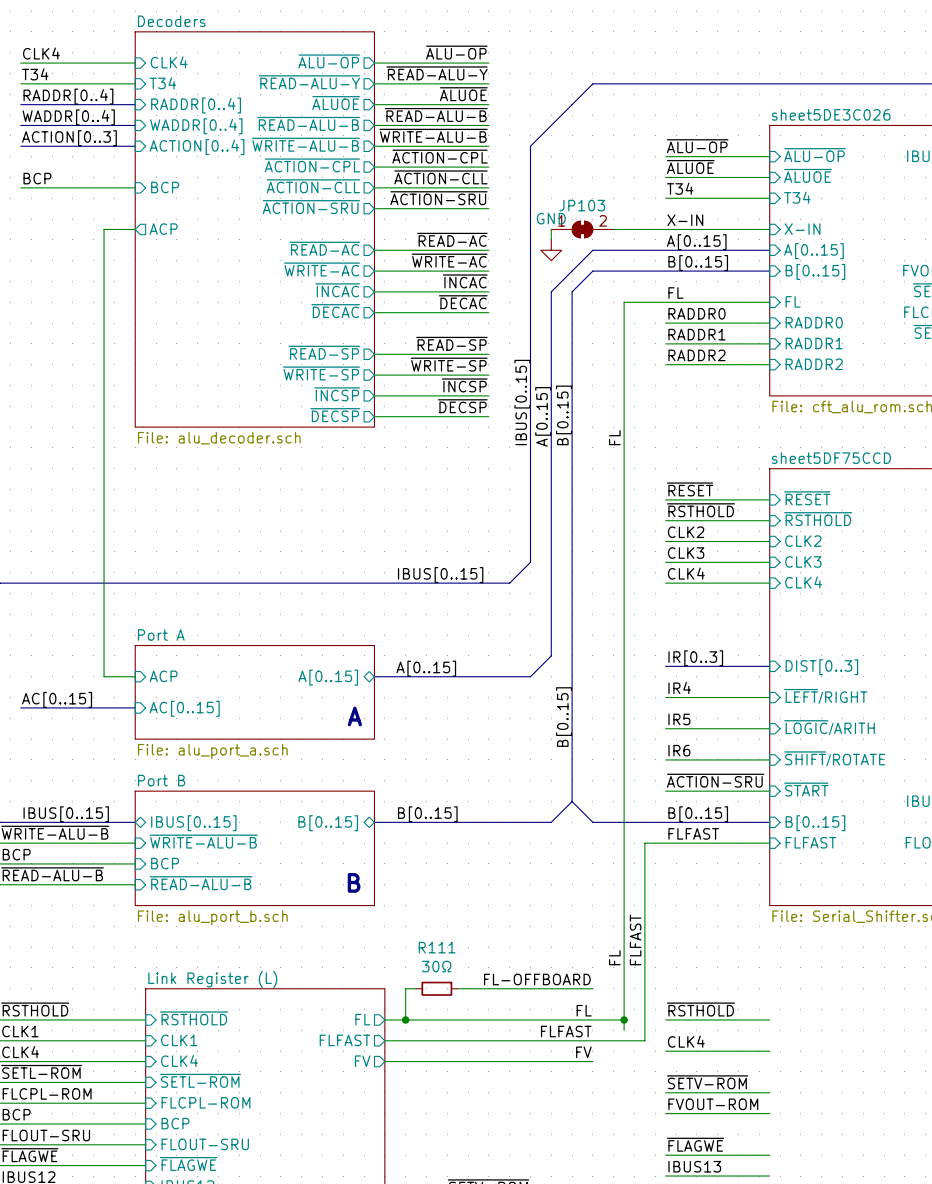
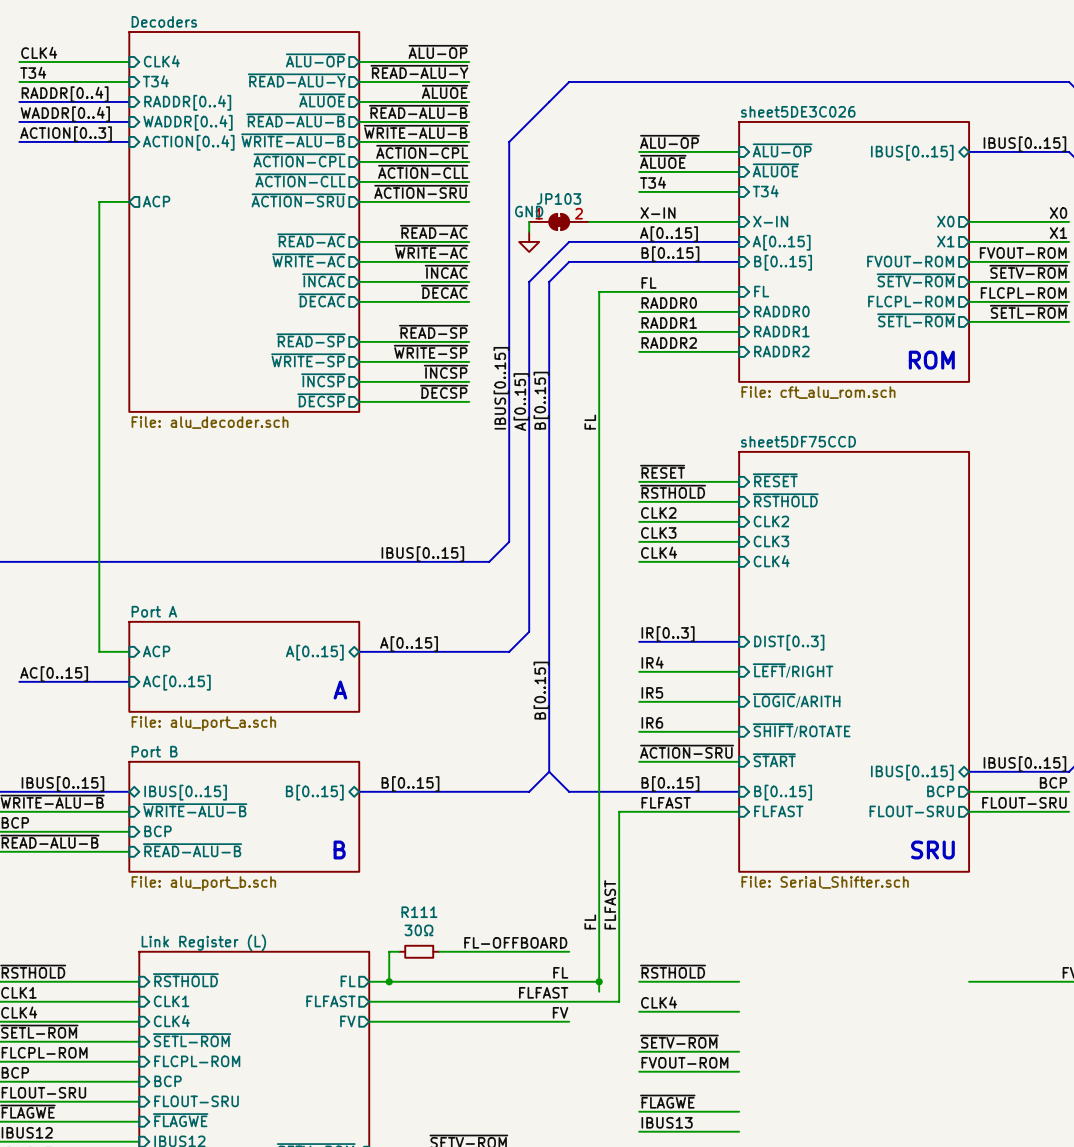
label: BCP (37, 178) -> none
wire: (20, 187) (135, 187) -> none
sheet pin: BCP (165, 187) -> none
wire: (104, 229) (135, 229) -> (99, 221) (99, 201) (129, 201)
sheet pin position: ACP (163, 229) -> ACP (156, 201)

